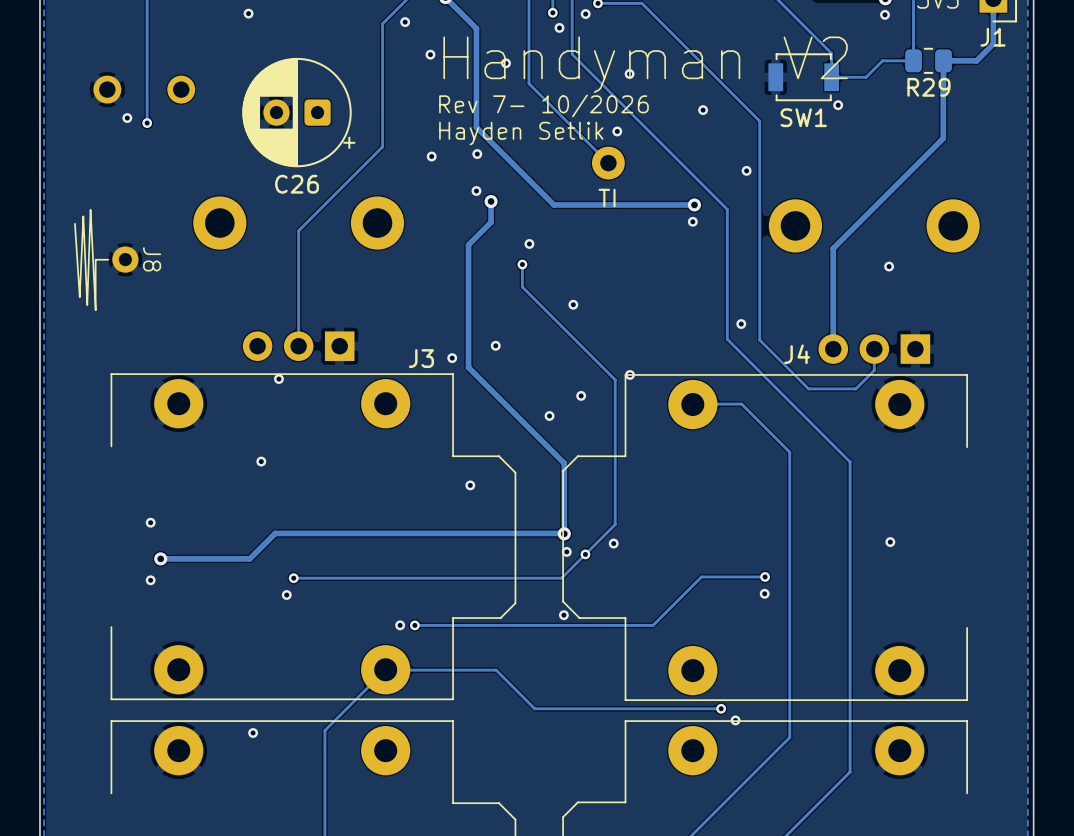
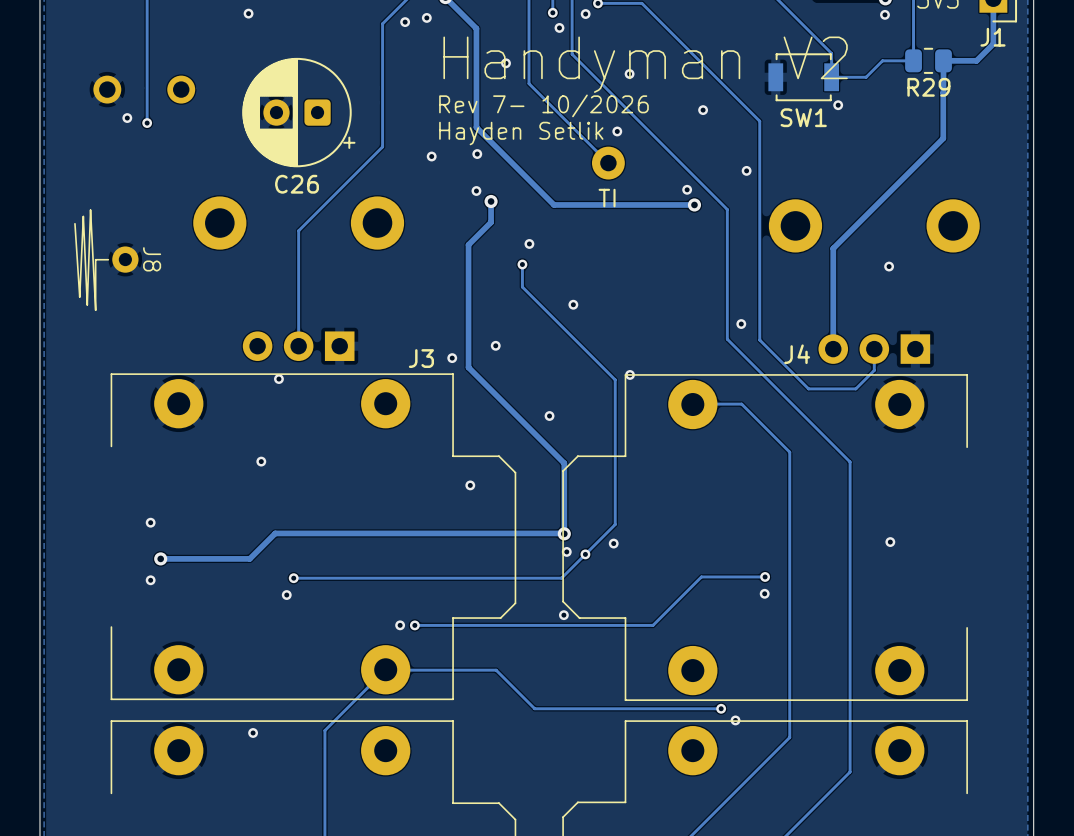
via: none -> (426, 17)
via: (430, 54) -> none
via position: (692, 221) -> (687, 189)
via: (581, 395) -> none

